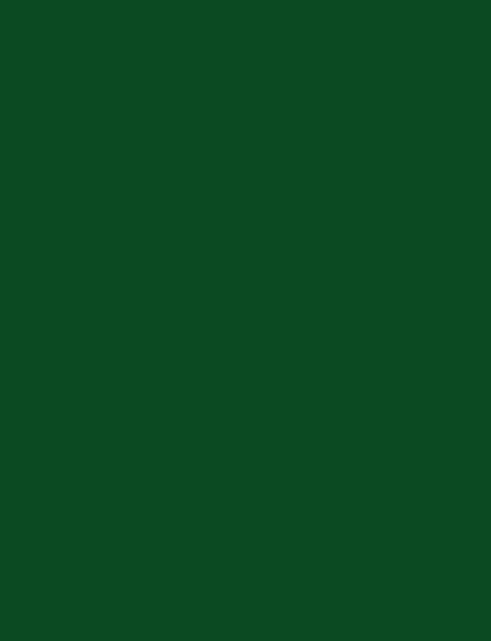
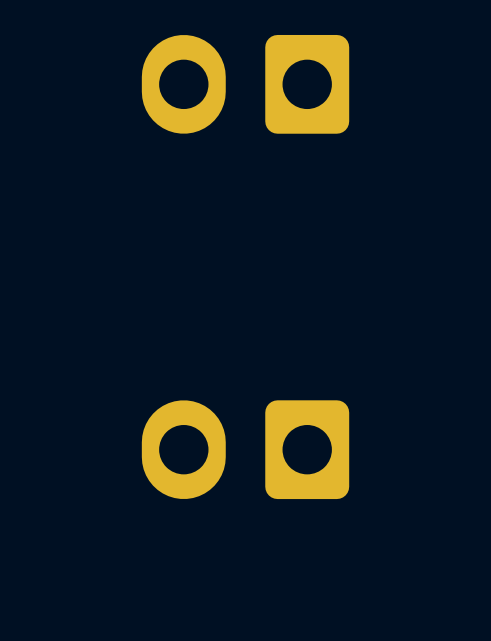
part: none -> (245, 84)
part: none -> (245, 449)

